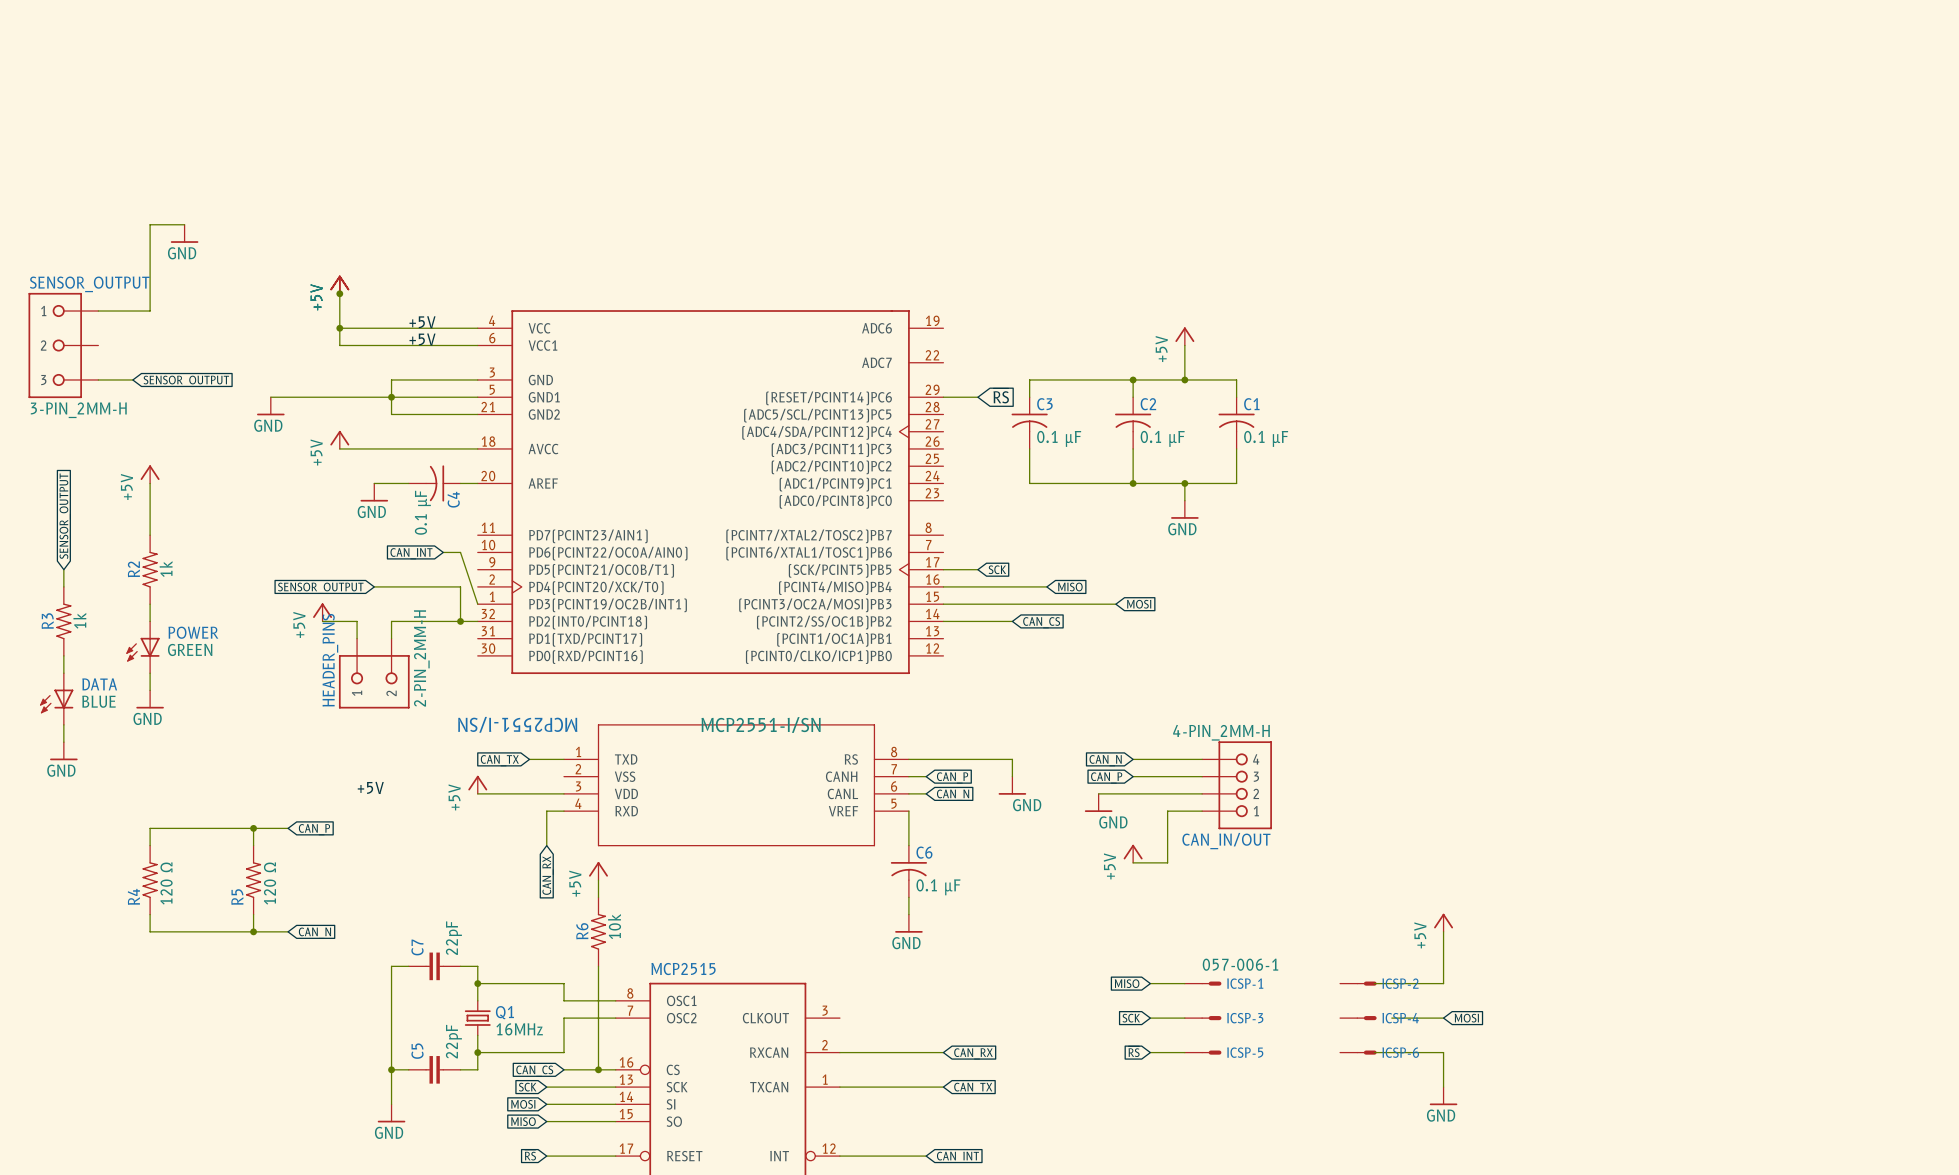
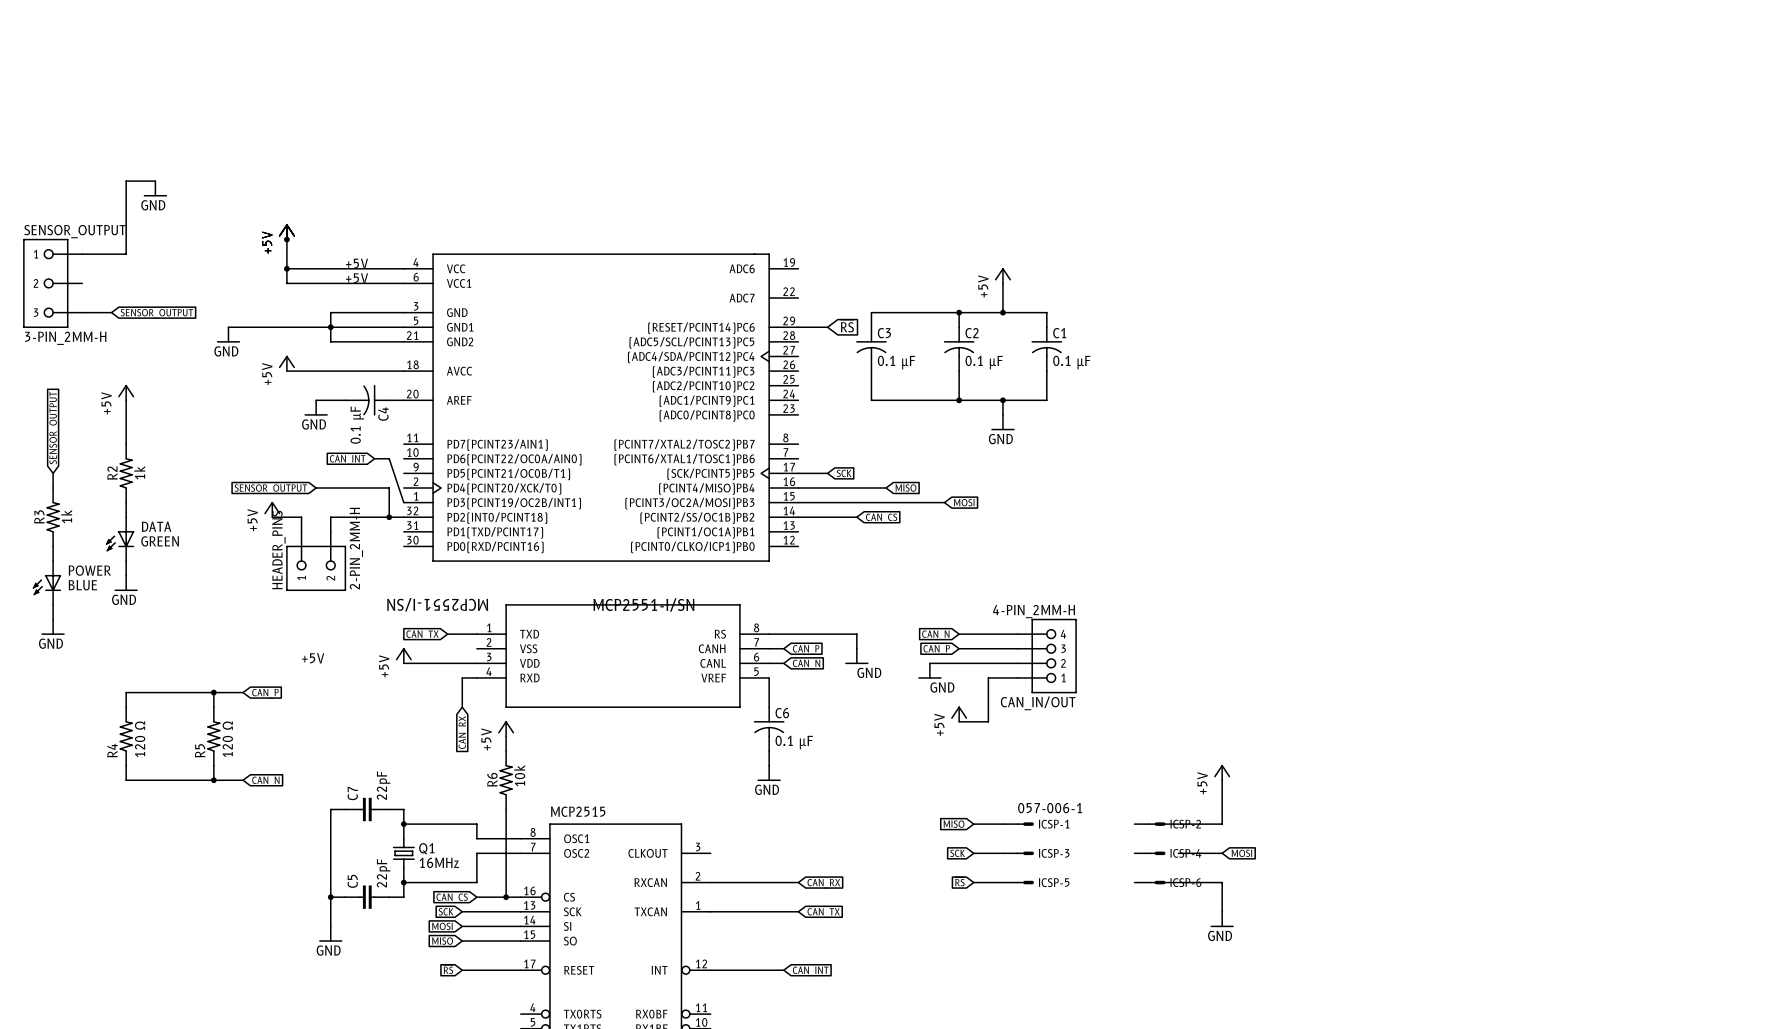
POWER name: POWER (193, 632) -> DATA (156, 526)
DATA name: DATA (99, 684) -> POWER (89, 570)

